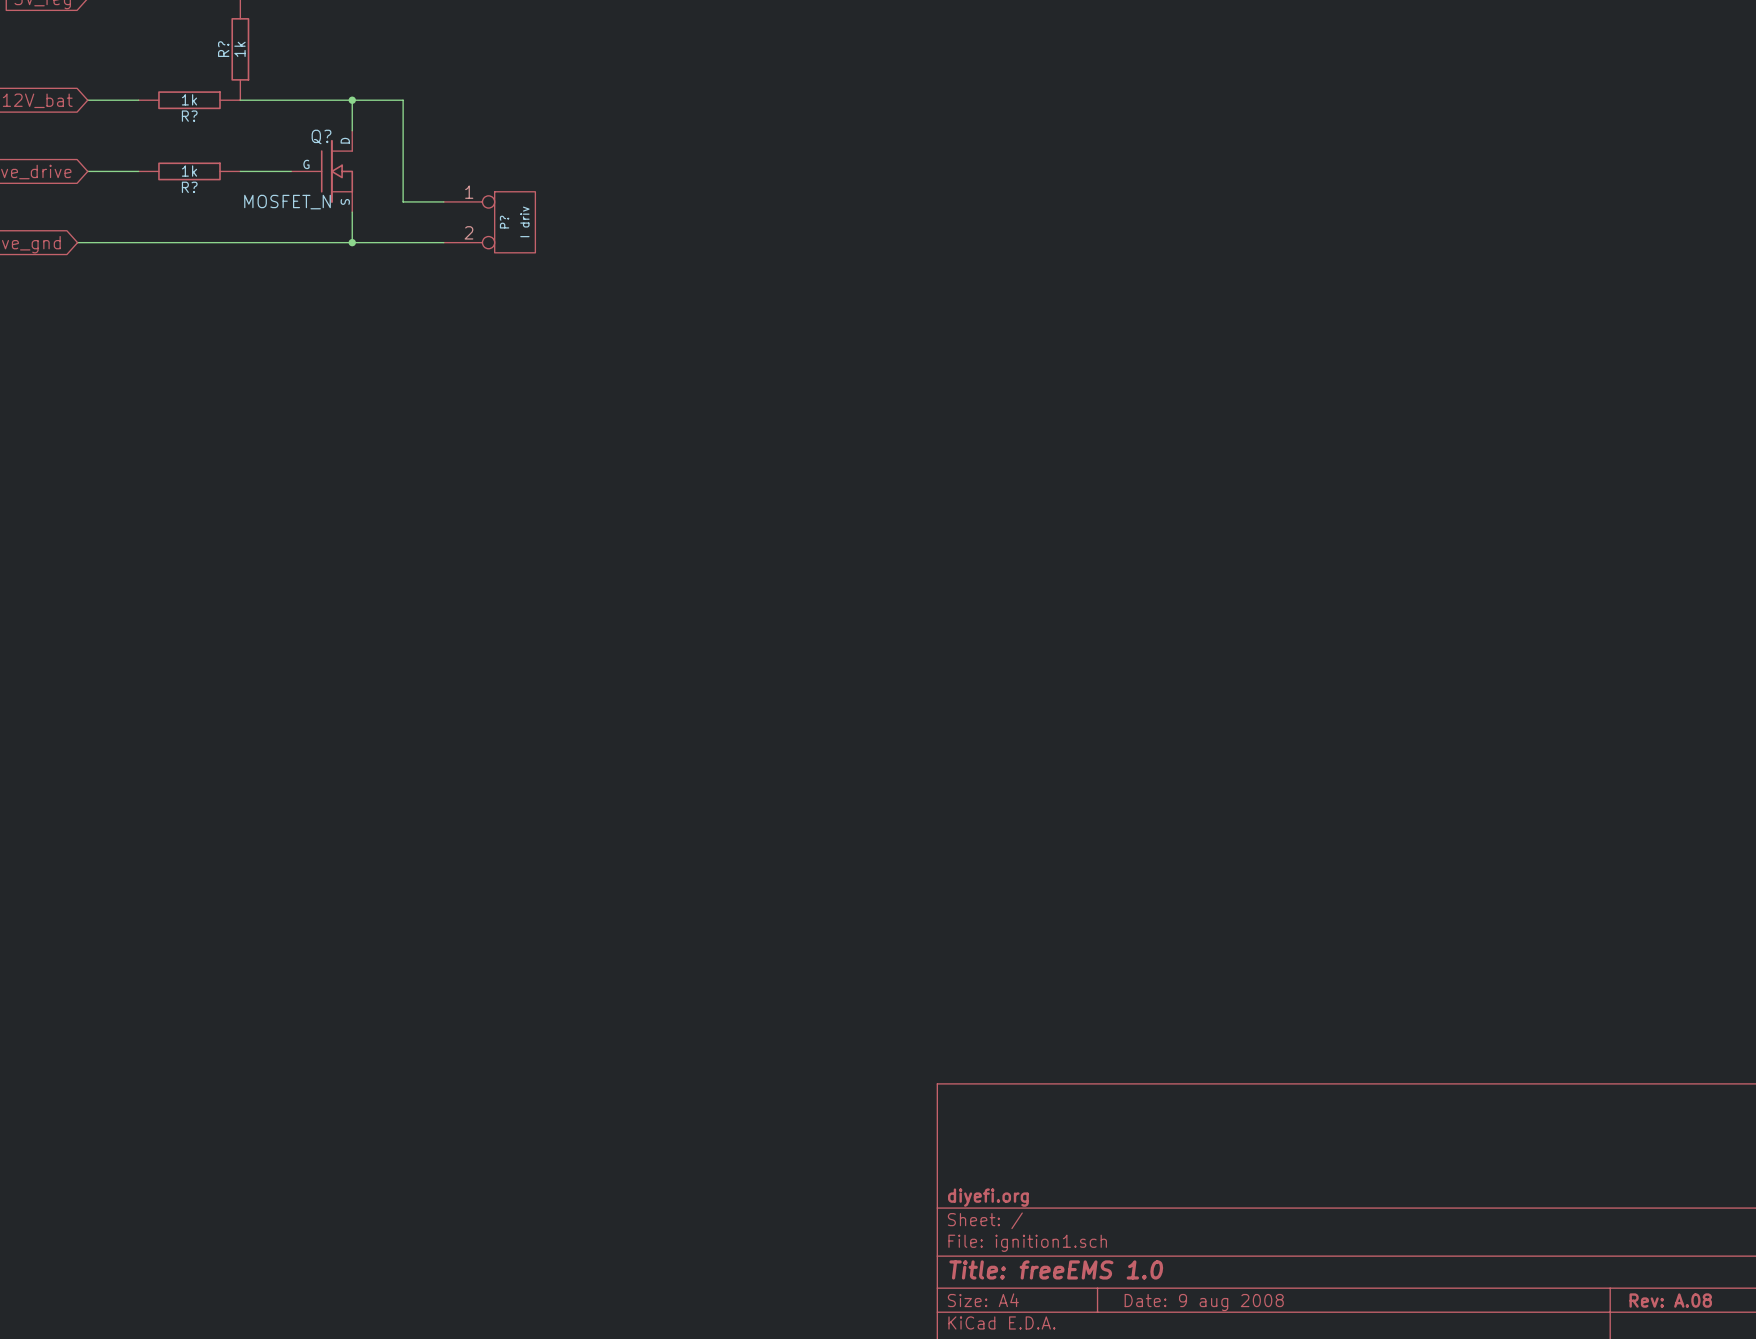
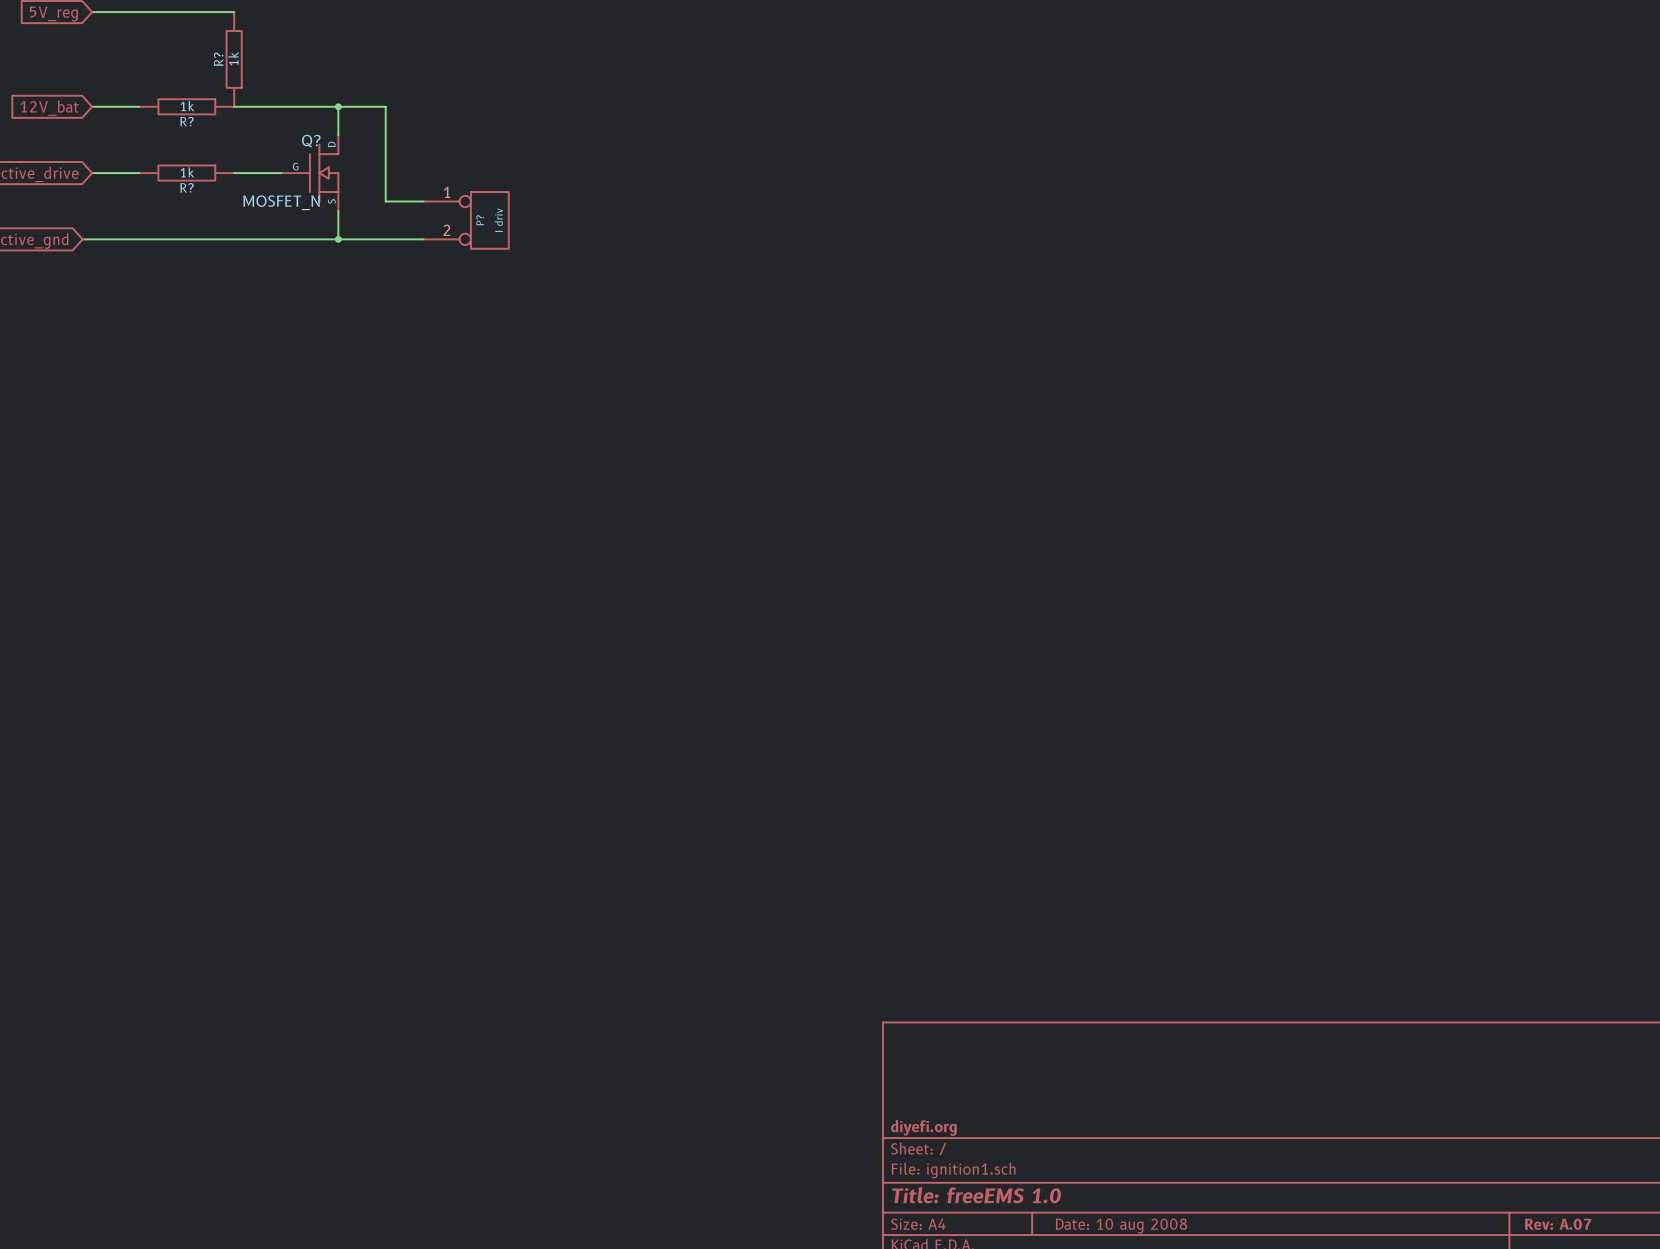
title block: Rev: A.08 (1670, 1300) -> Rev: A.07 (1558, 1224)
title block: Date: 9 aug 2008 (1204, 1302) -> Date: 10 aug 2008 (1121, 1226)

